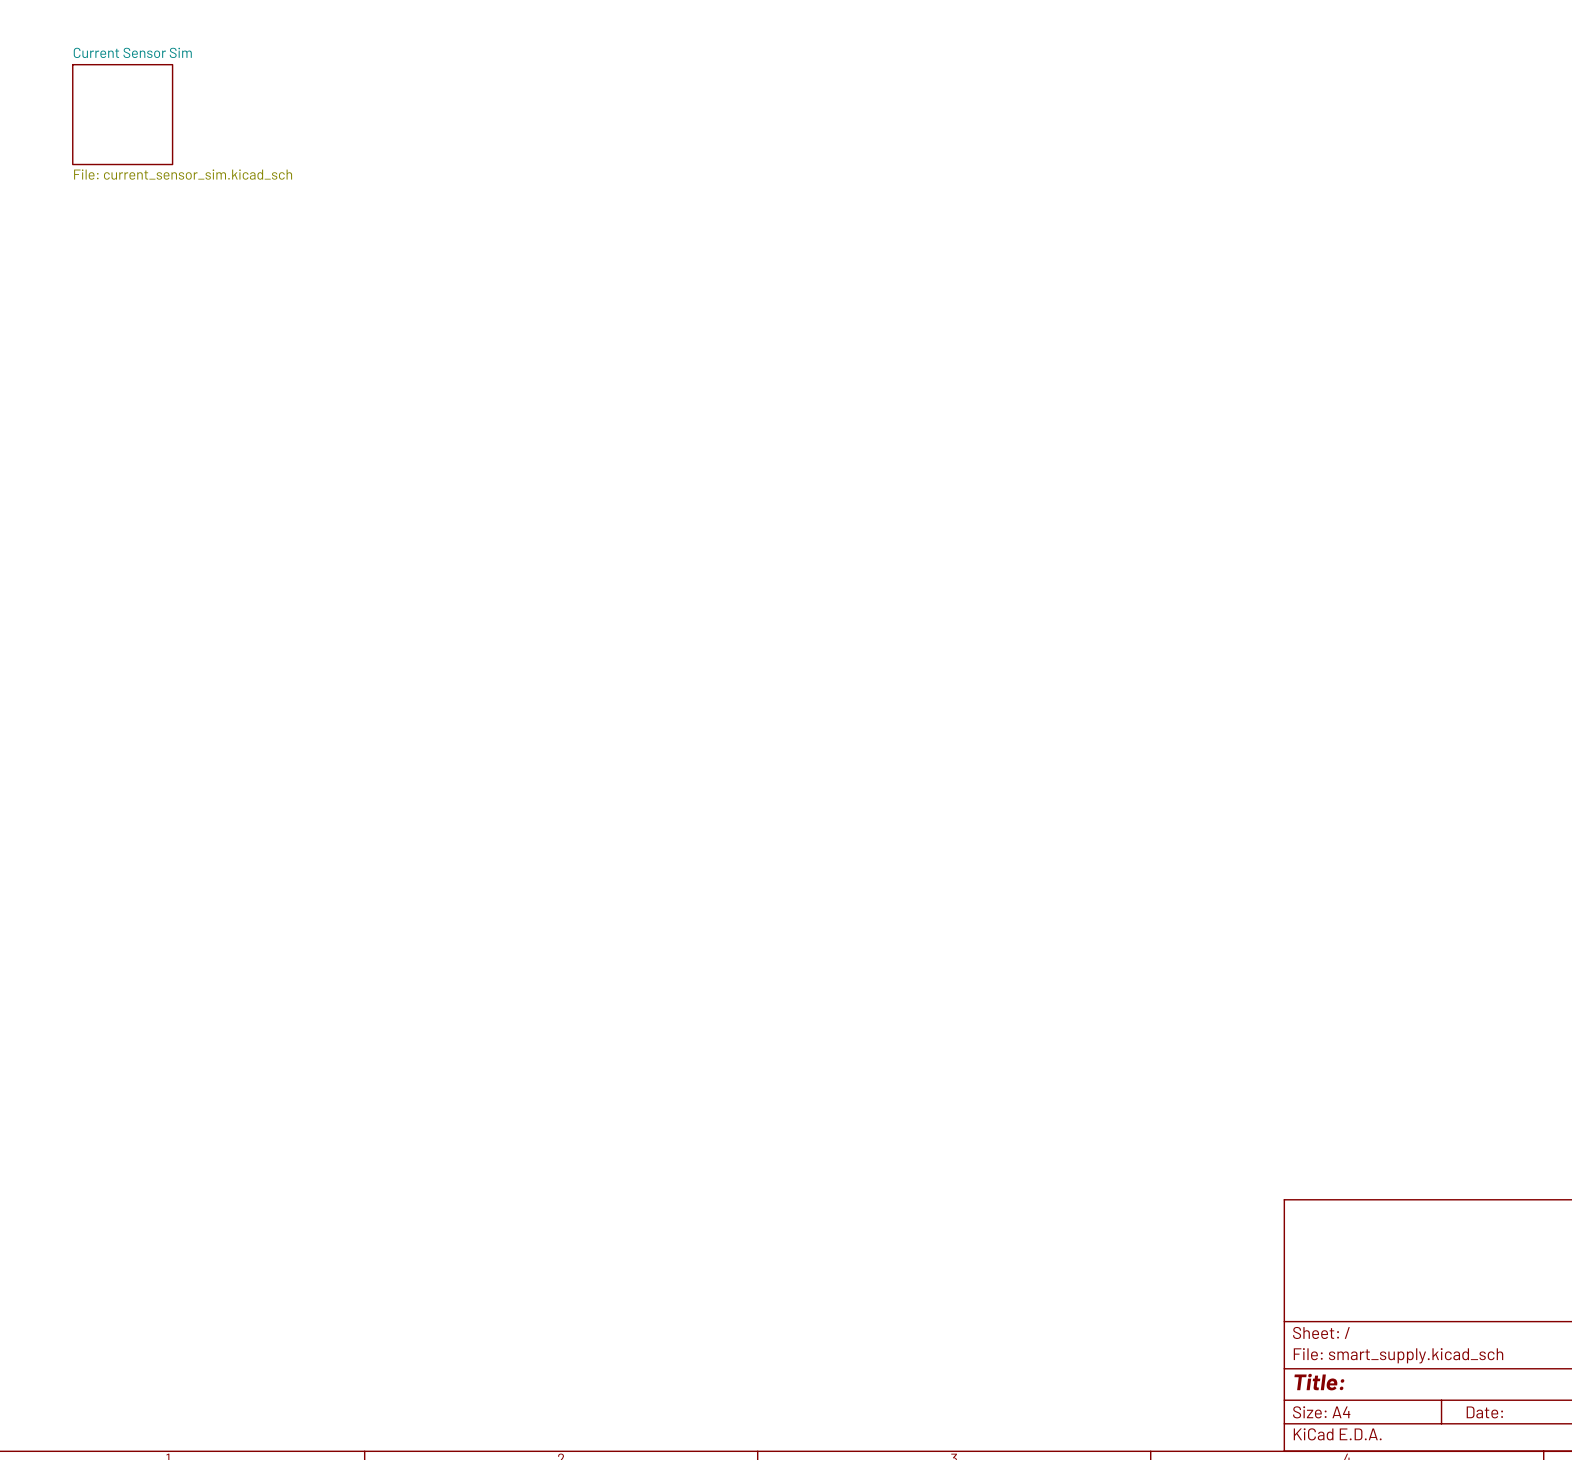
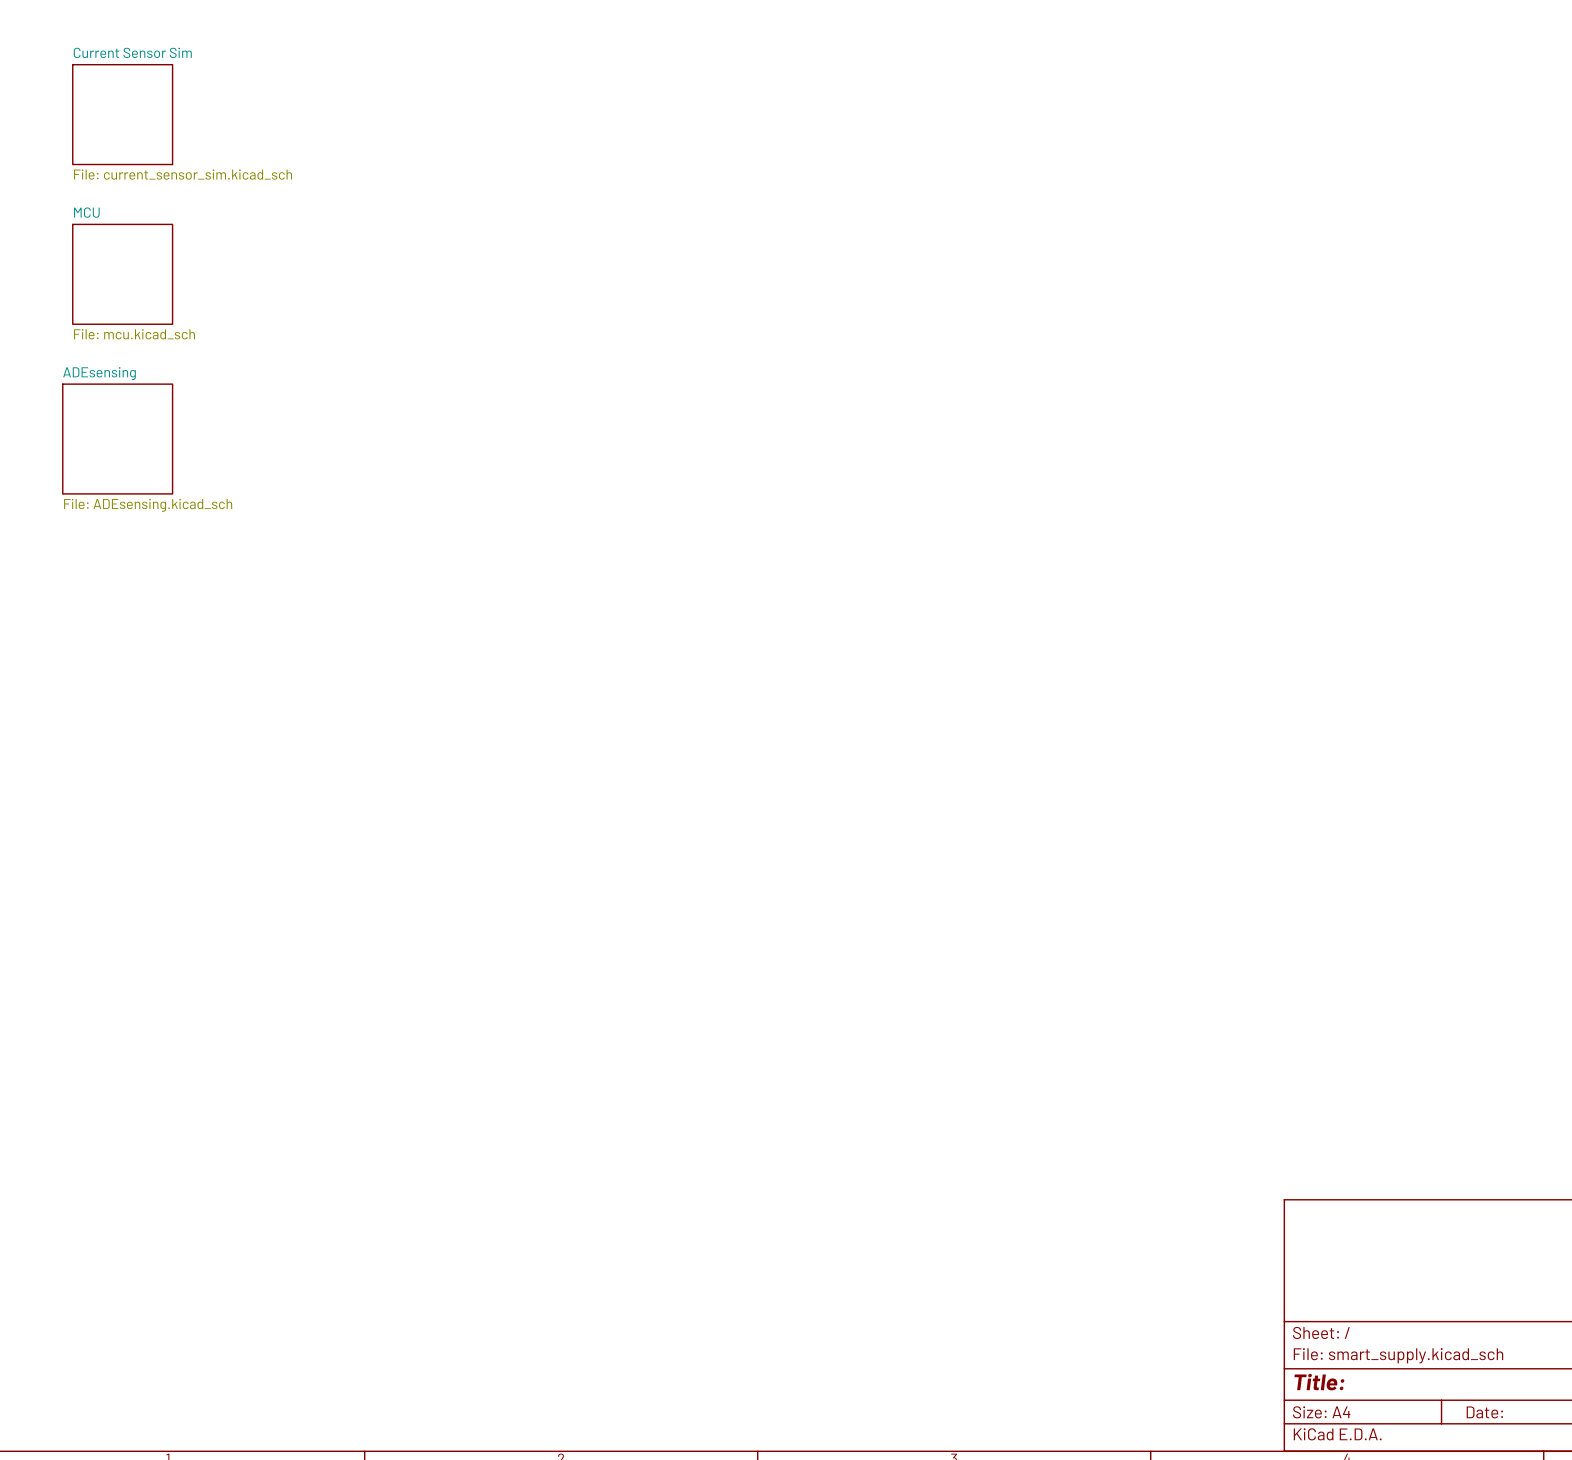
sheet MCU: none -> File: mcu.kicad_sch (122, 274)
sheet ADEsensing: none -> File: ADEsensing.kicad_sch (117, 439)

